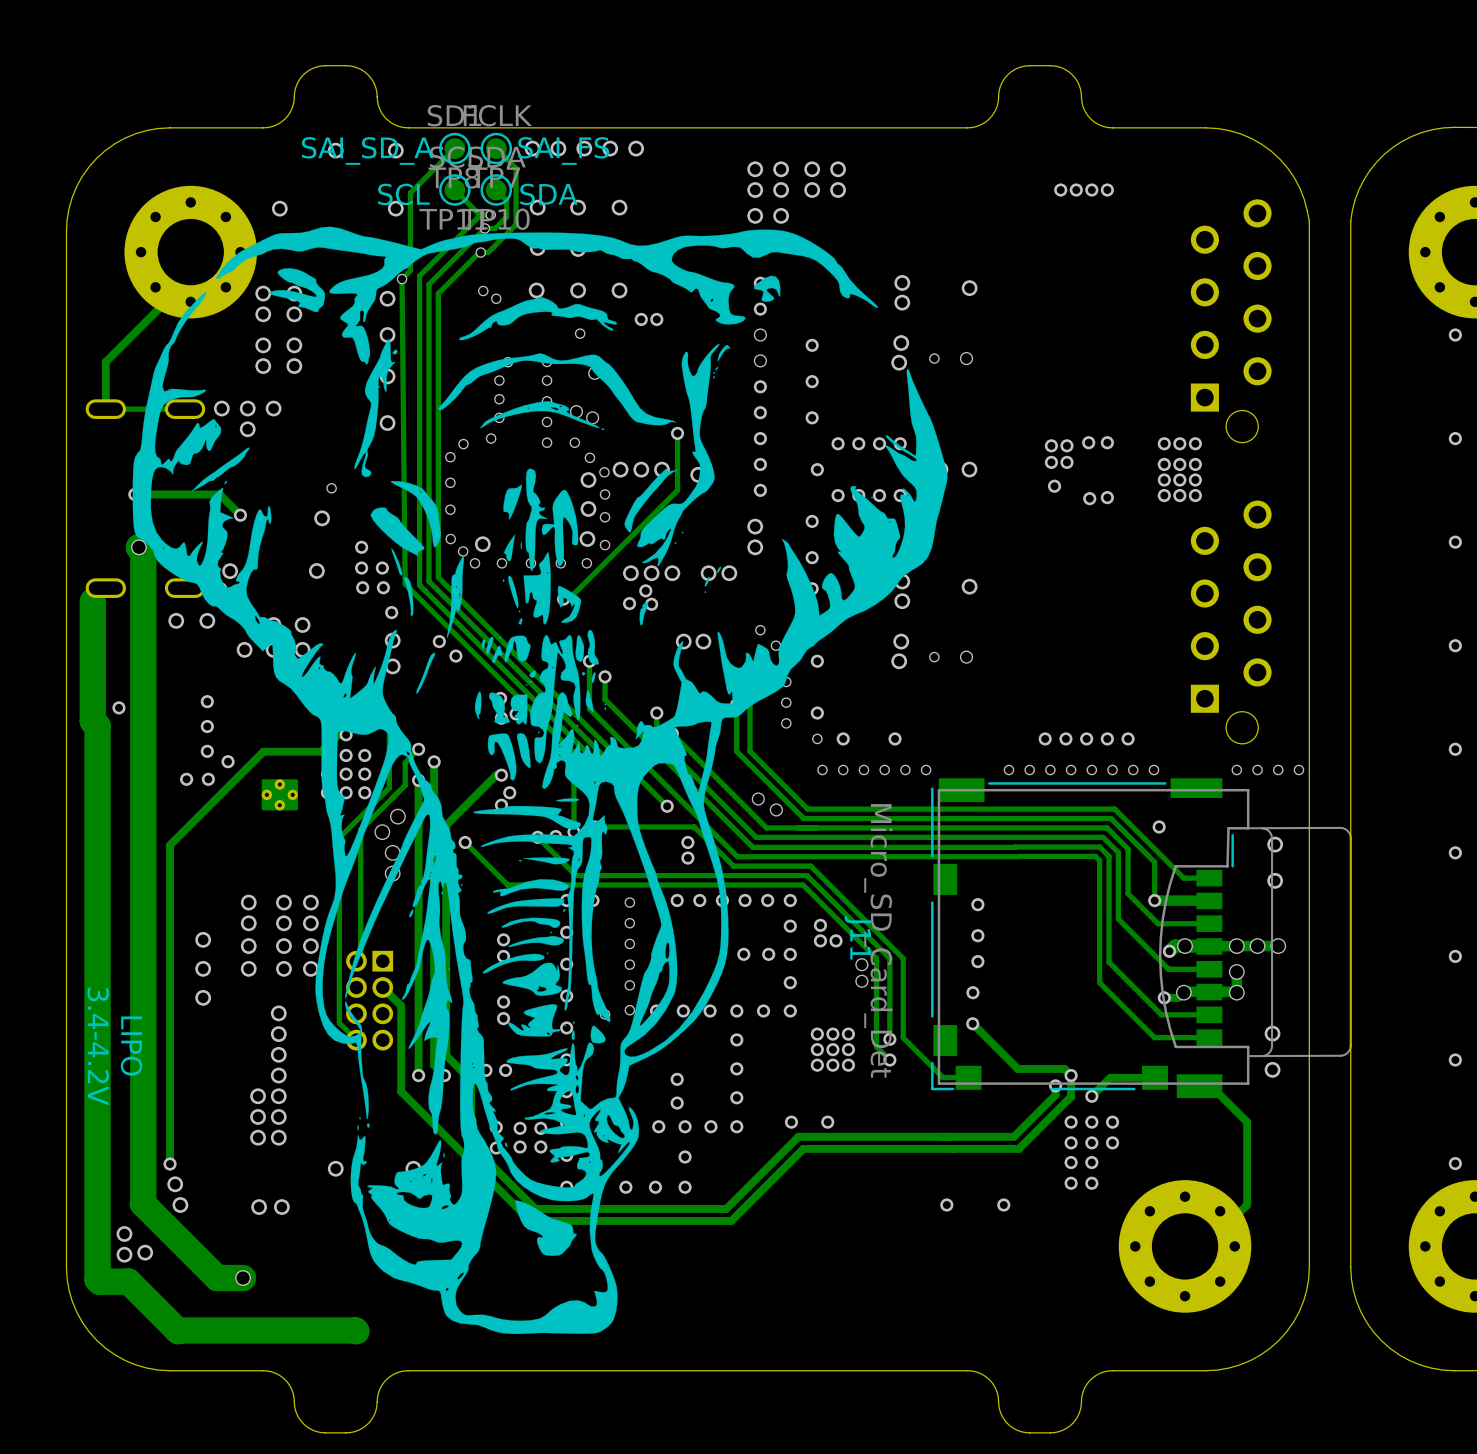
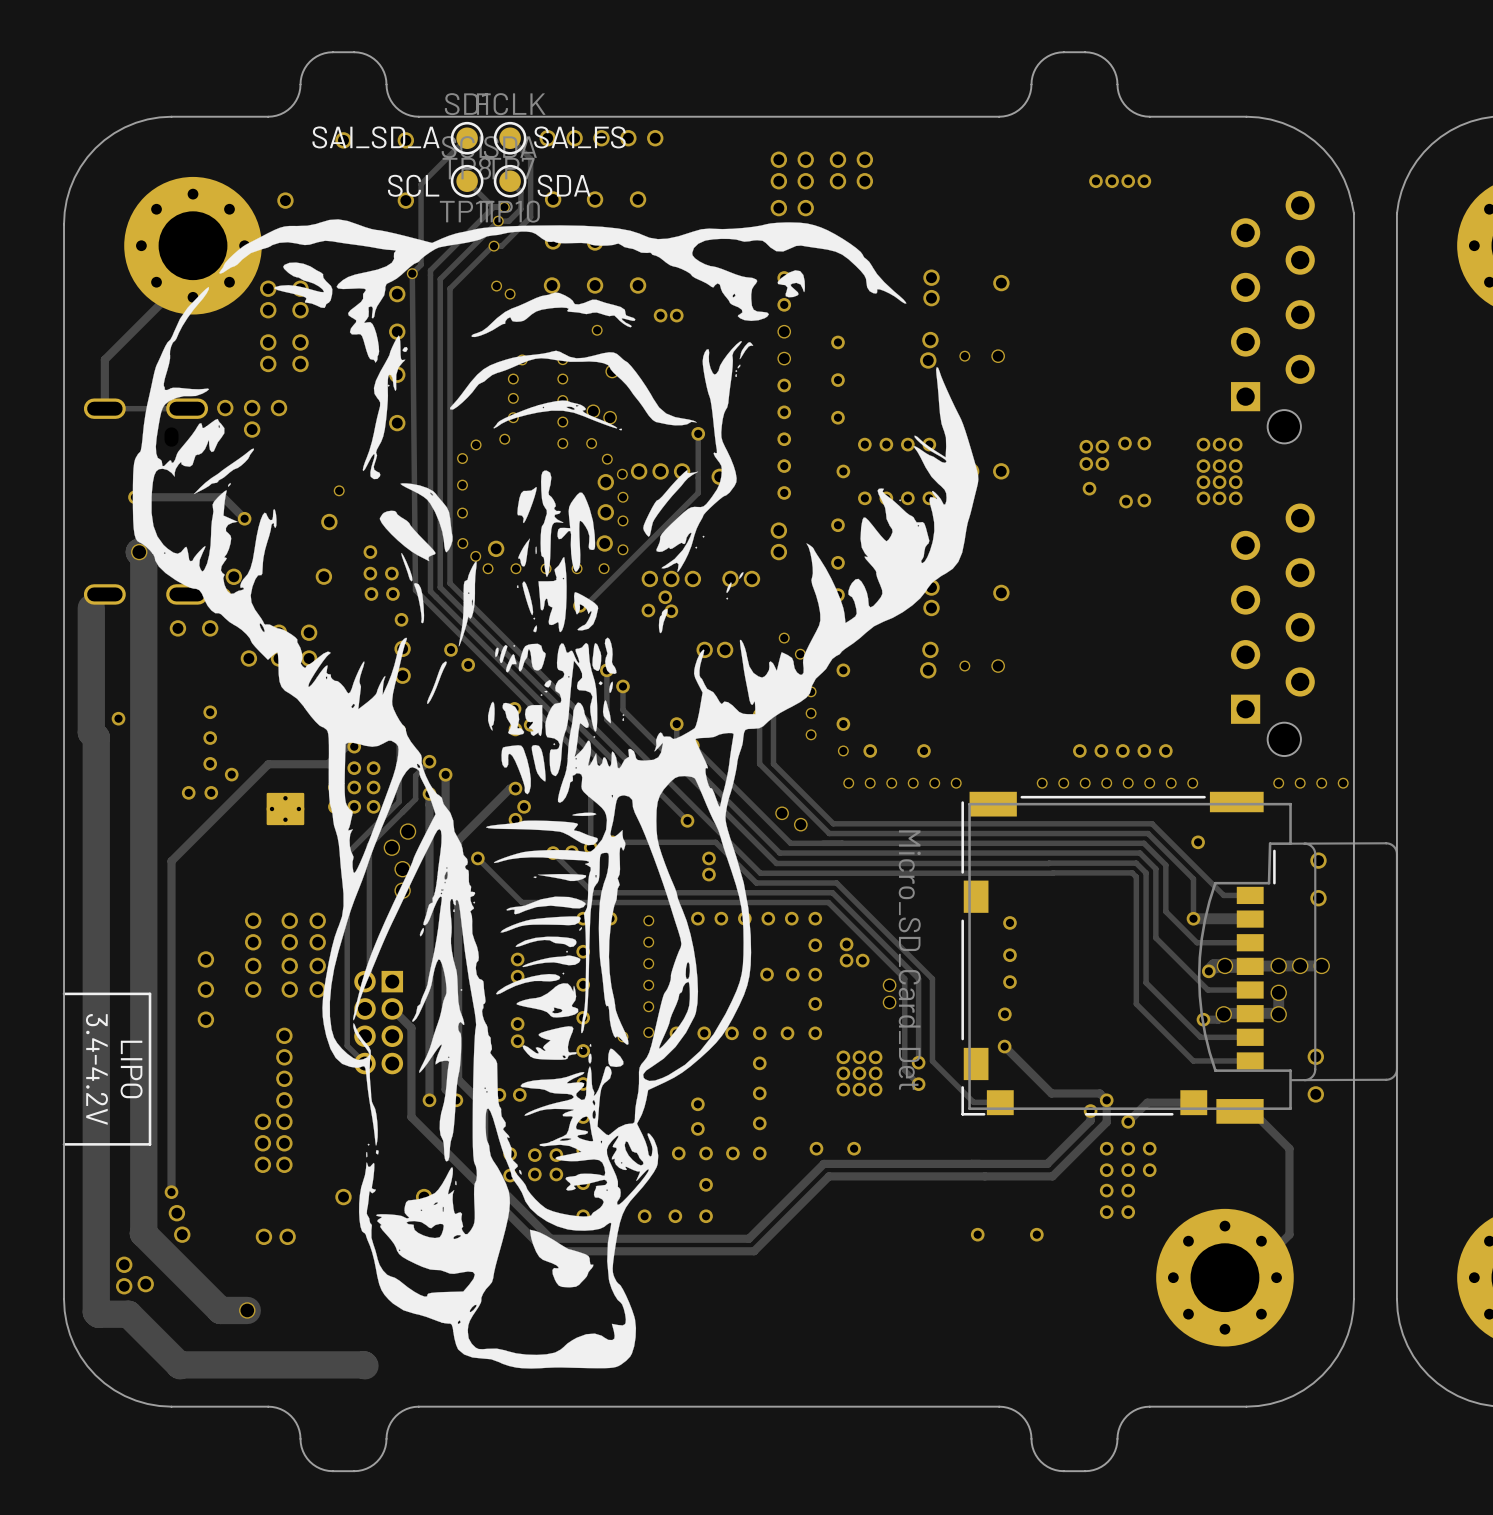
J11 name: J11 (857, 937) -> none
line: none -> (64, 993) (150, 993) (150, 1144) (64, 1144)

